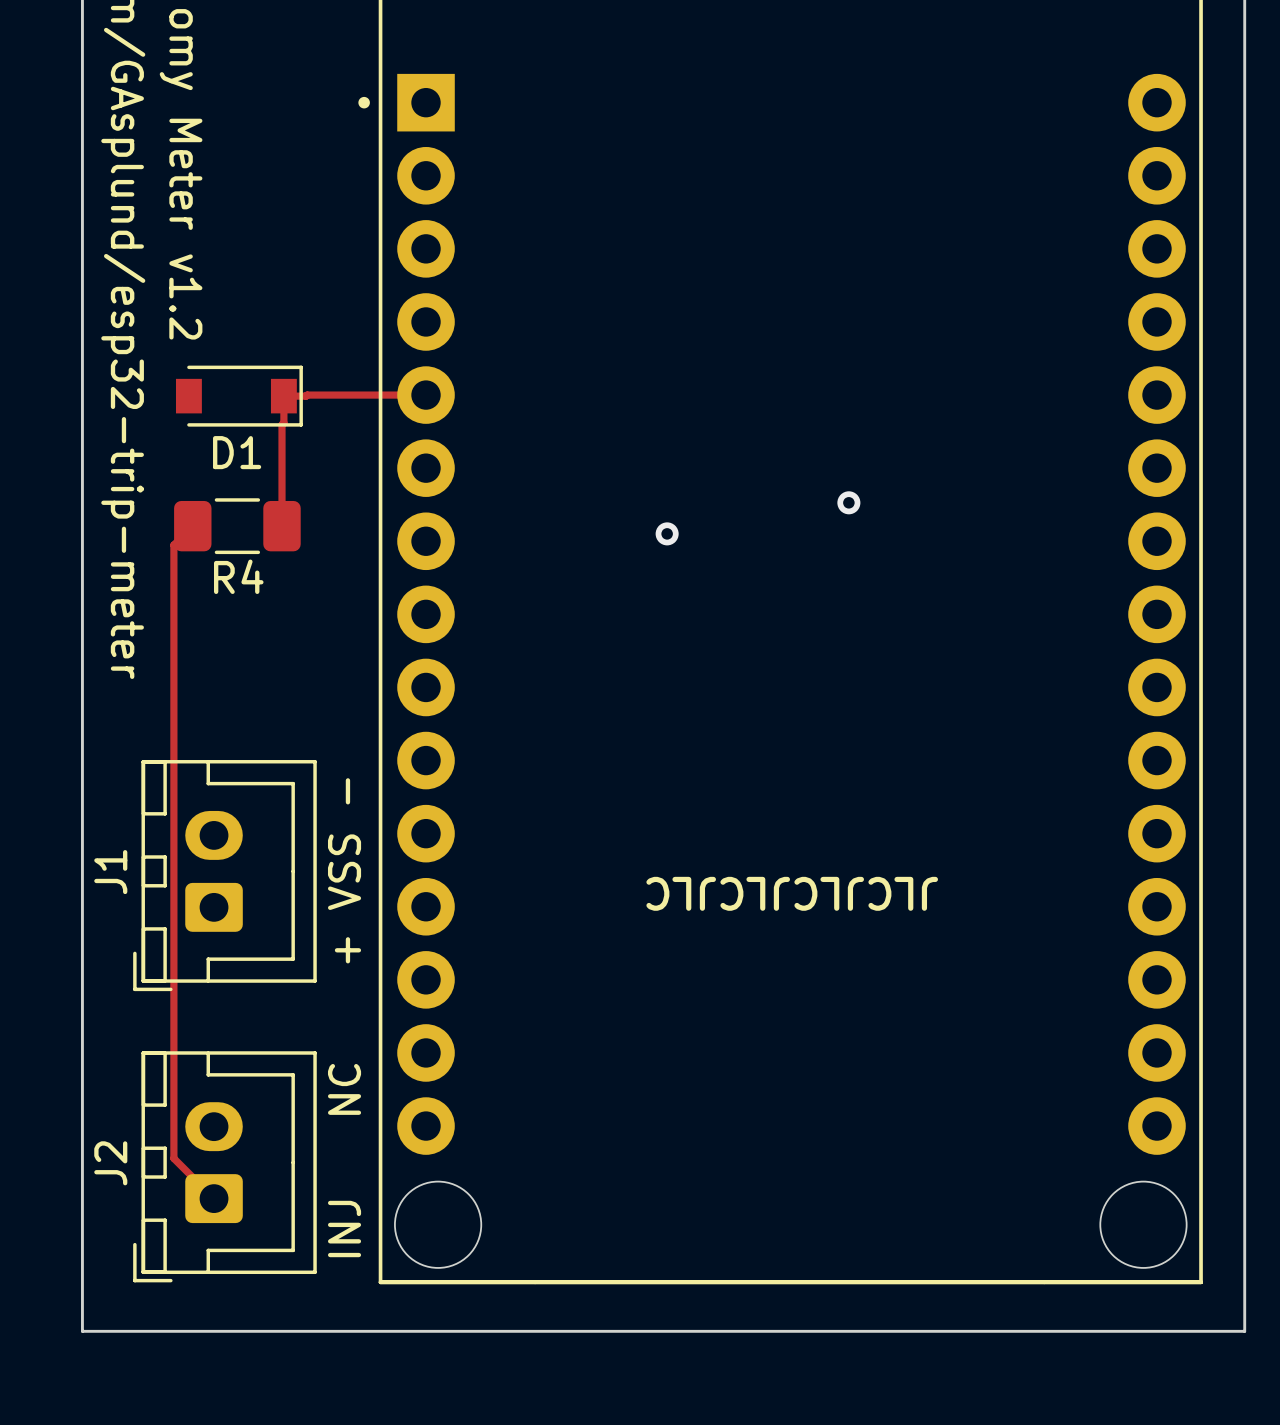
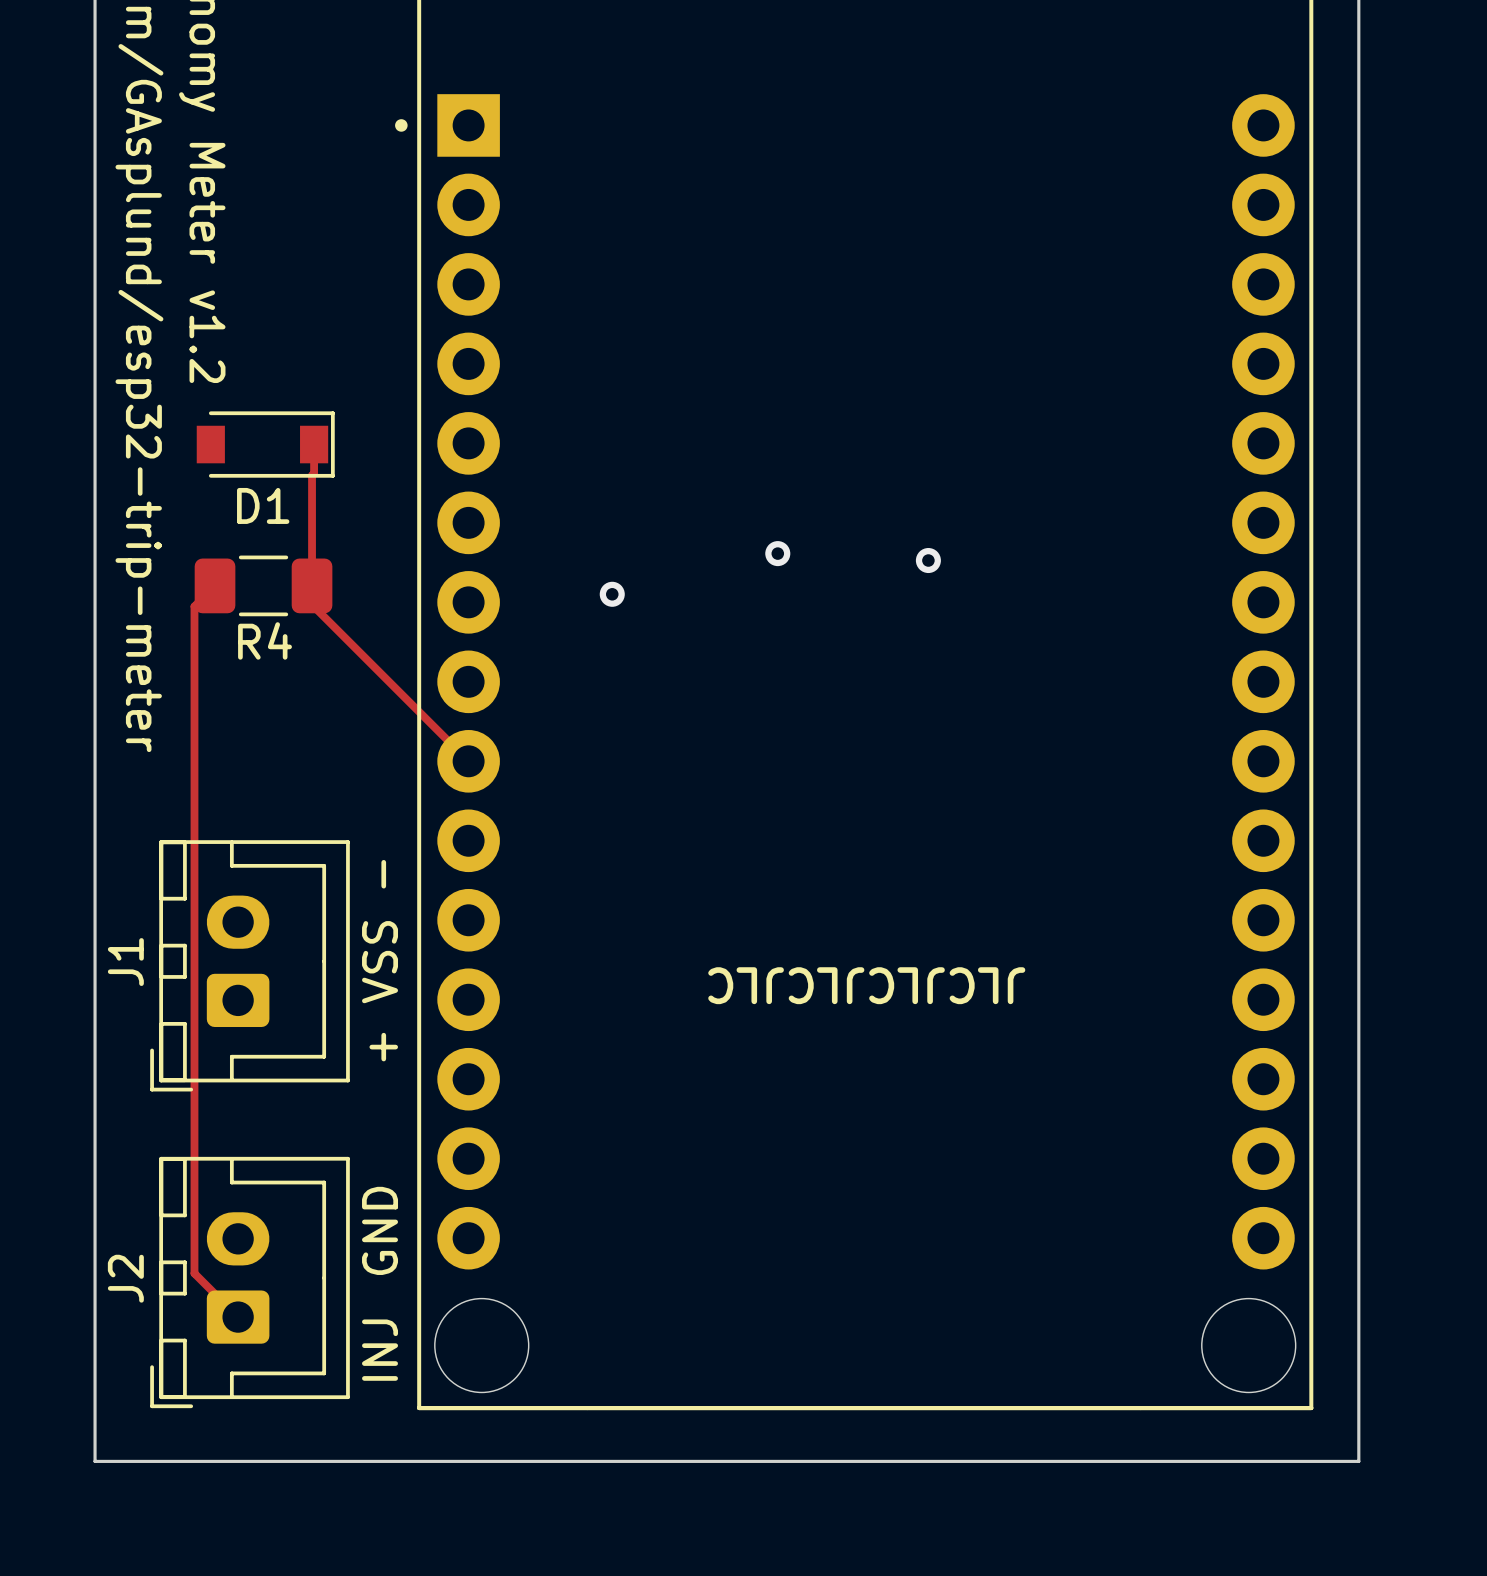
track: (426, 395) (283, 396) -> none
via: none -> (777, 553)
track: none -> (312, 585) (312, 604) (468, 761)
via: none -> (612, 594)
via: (667, 533) -> none
text: NC (344, 1089) -> none
text: none -> GND (380, 1230)

